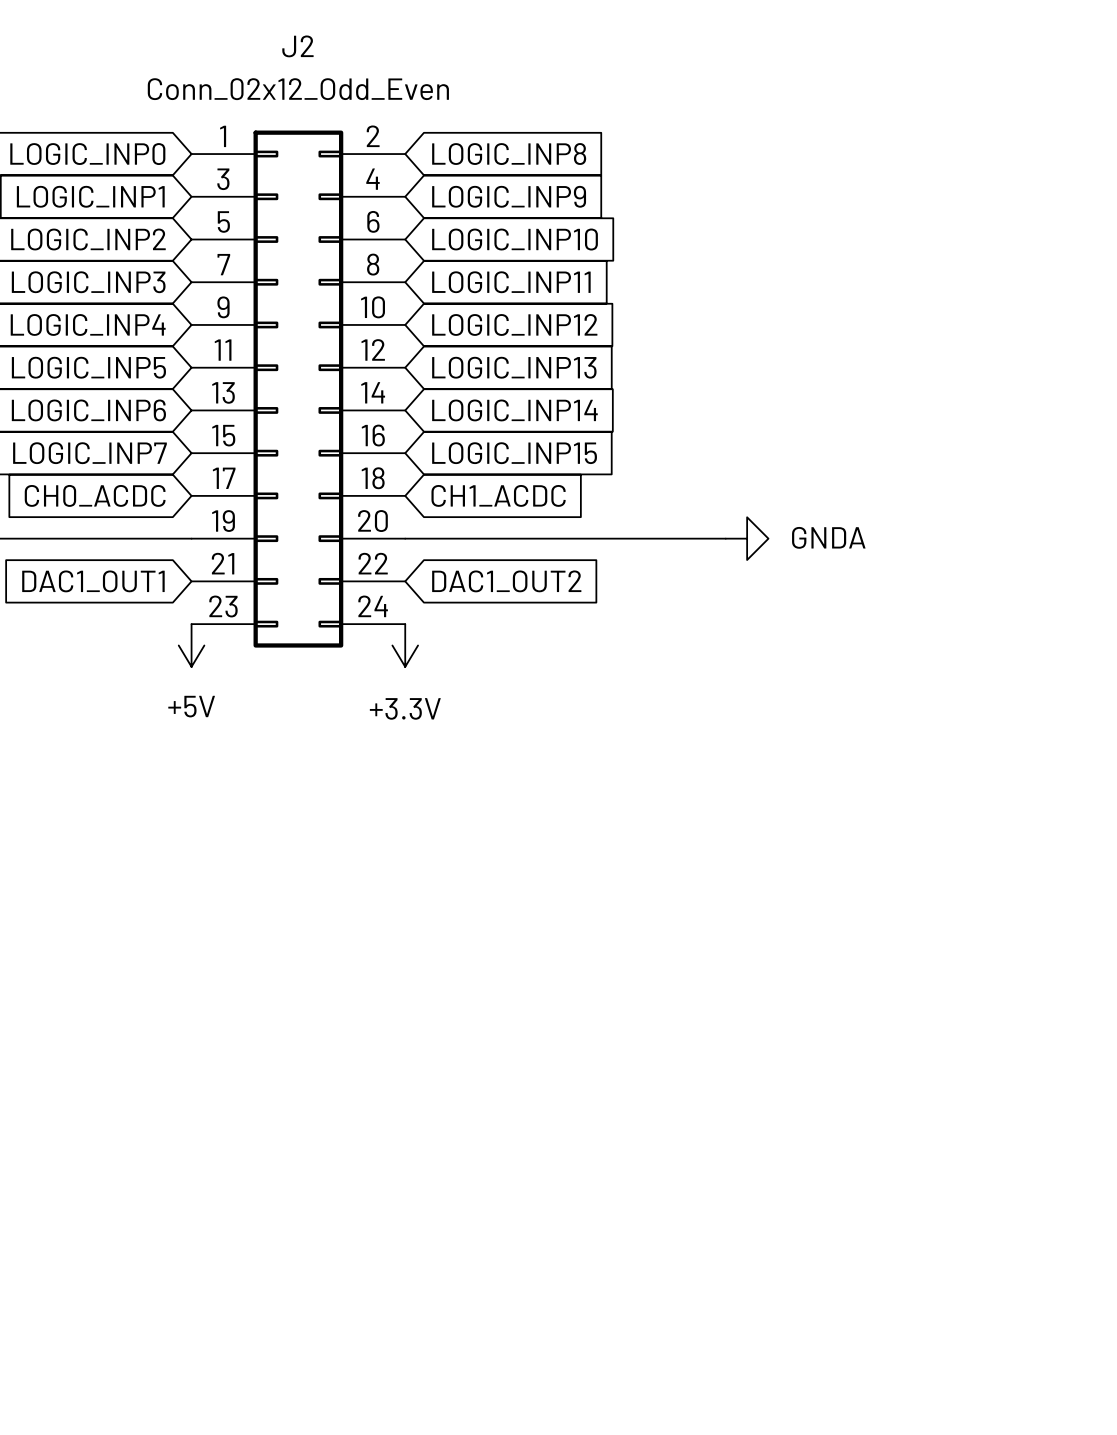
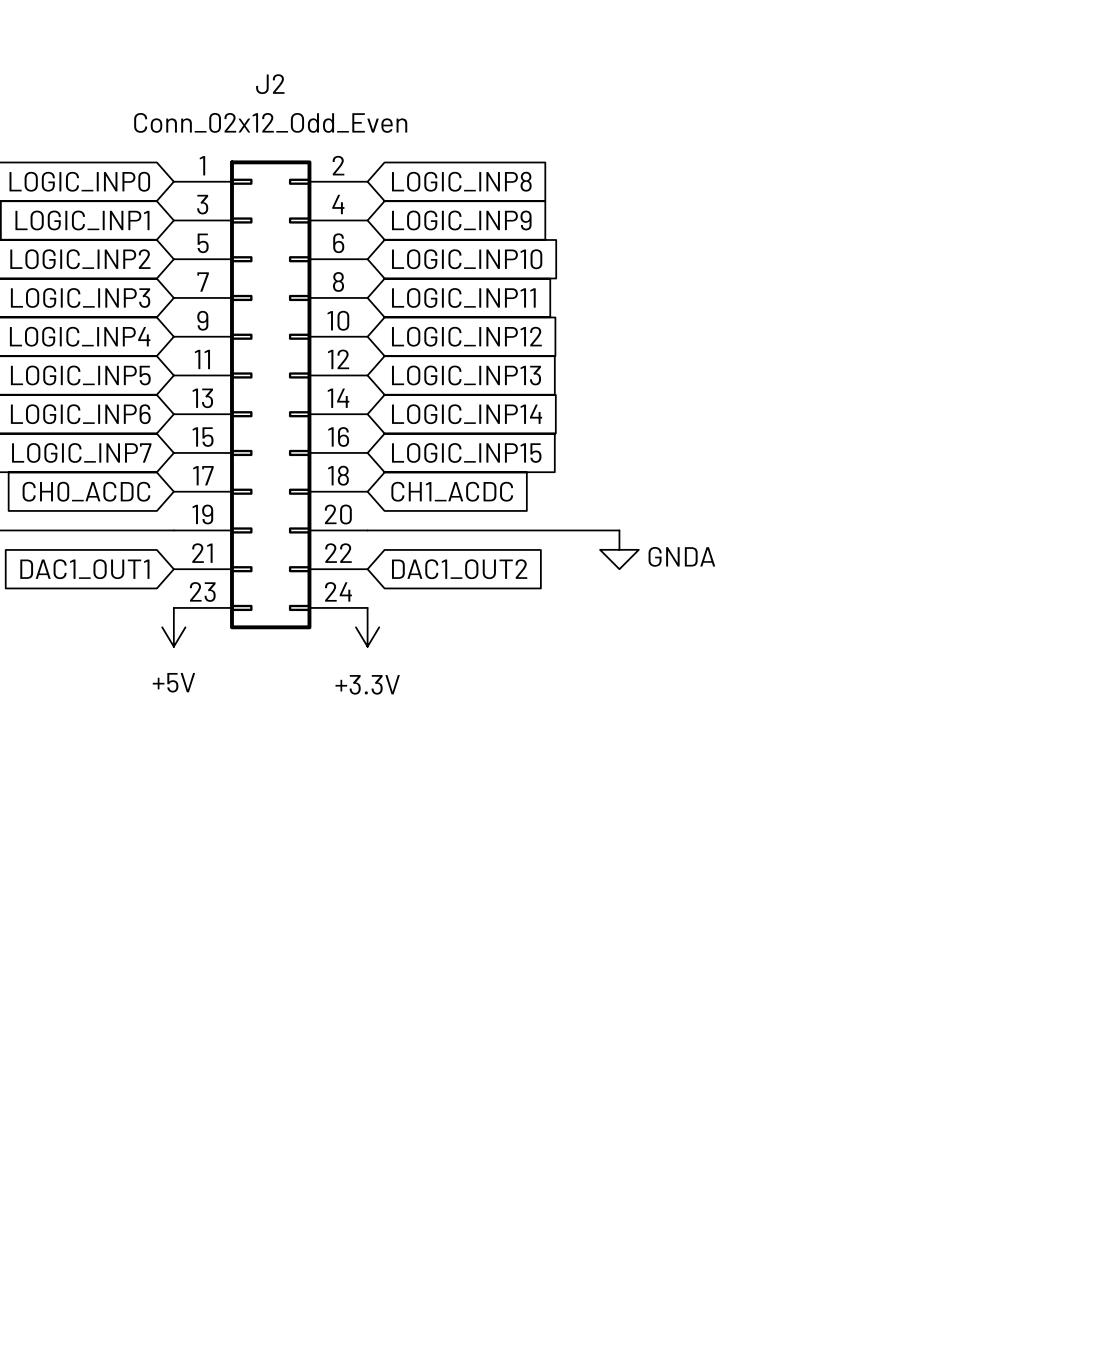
wire: (683, 538) (725, 538) -> none
power symbol rotation: 0° (747, 538) -> 90° clockwise (619, 549)
power symbol position: GNDA (747, 538) -> GNDA (619, 549)

